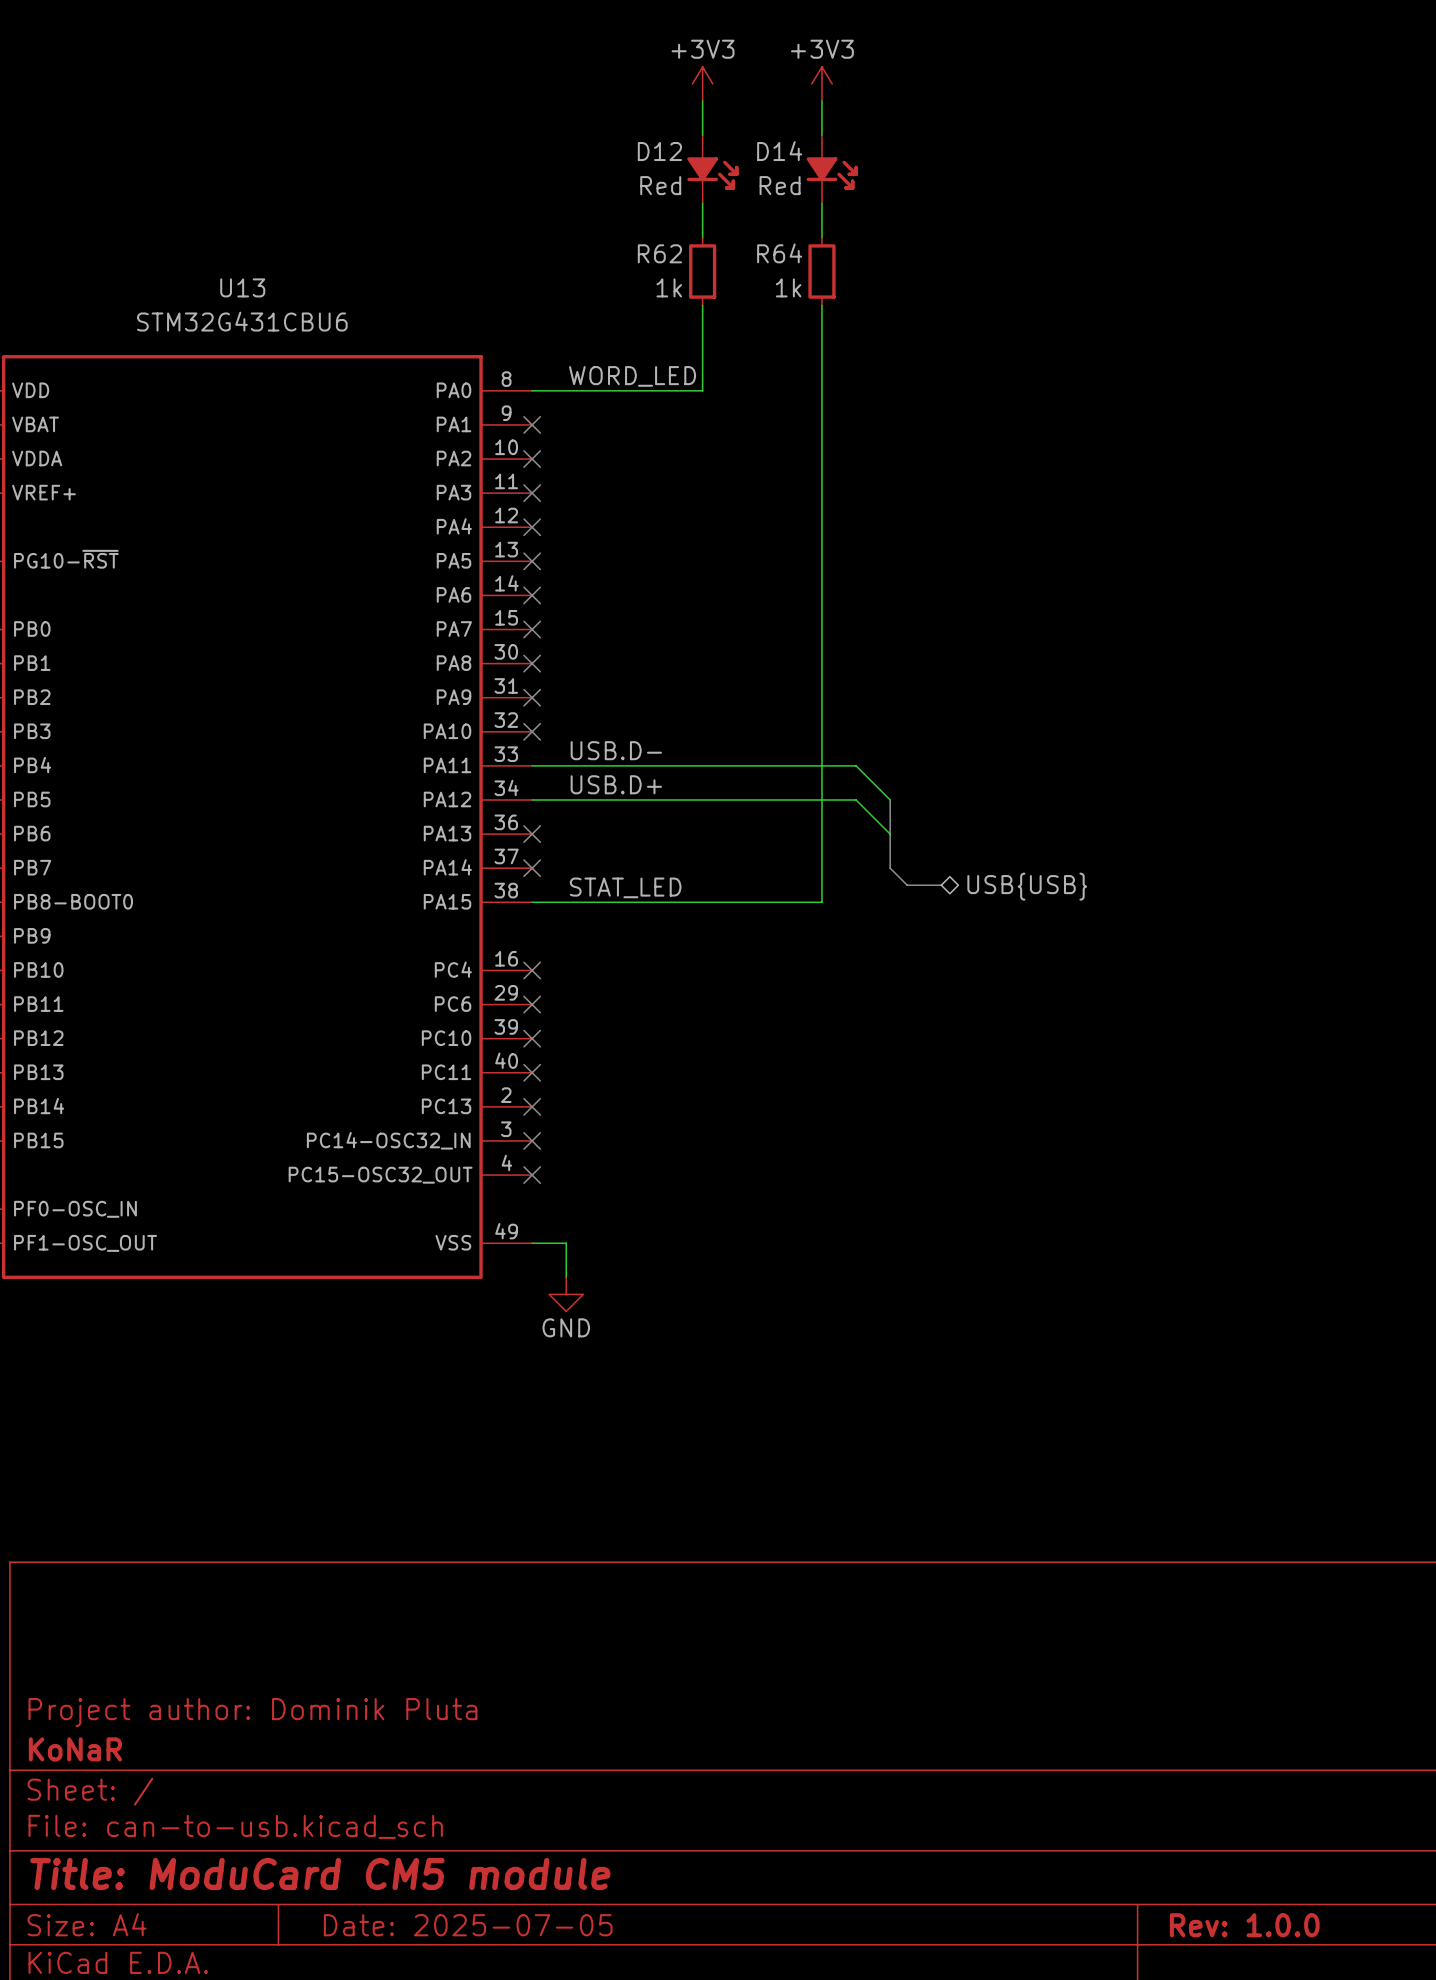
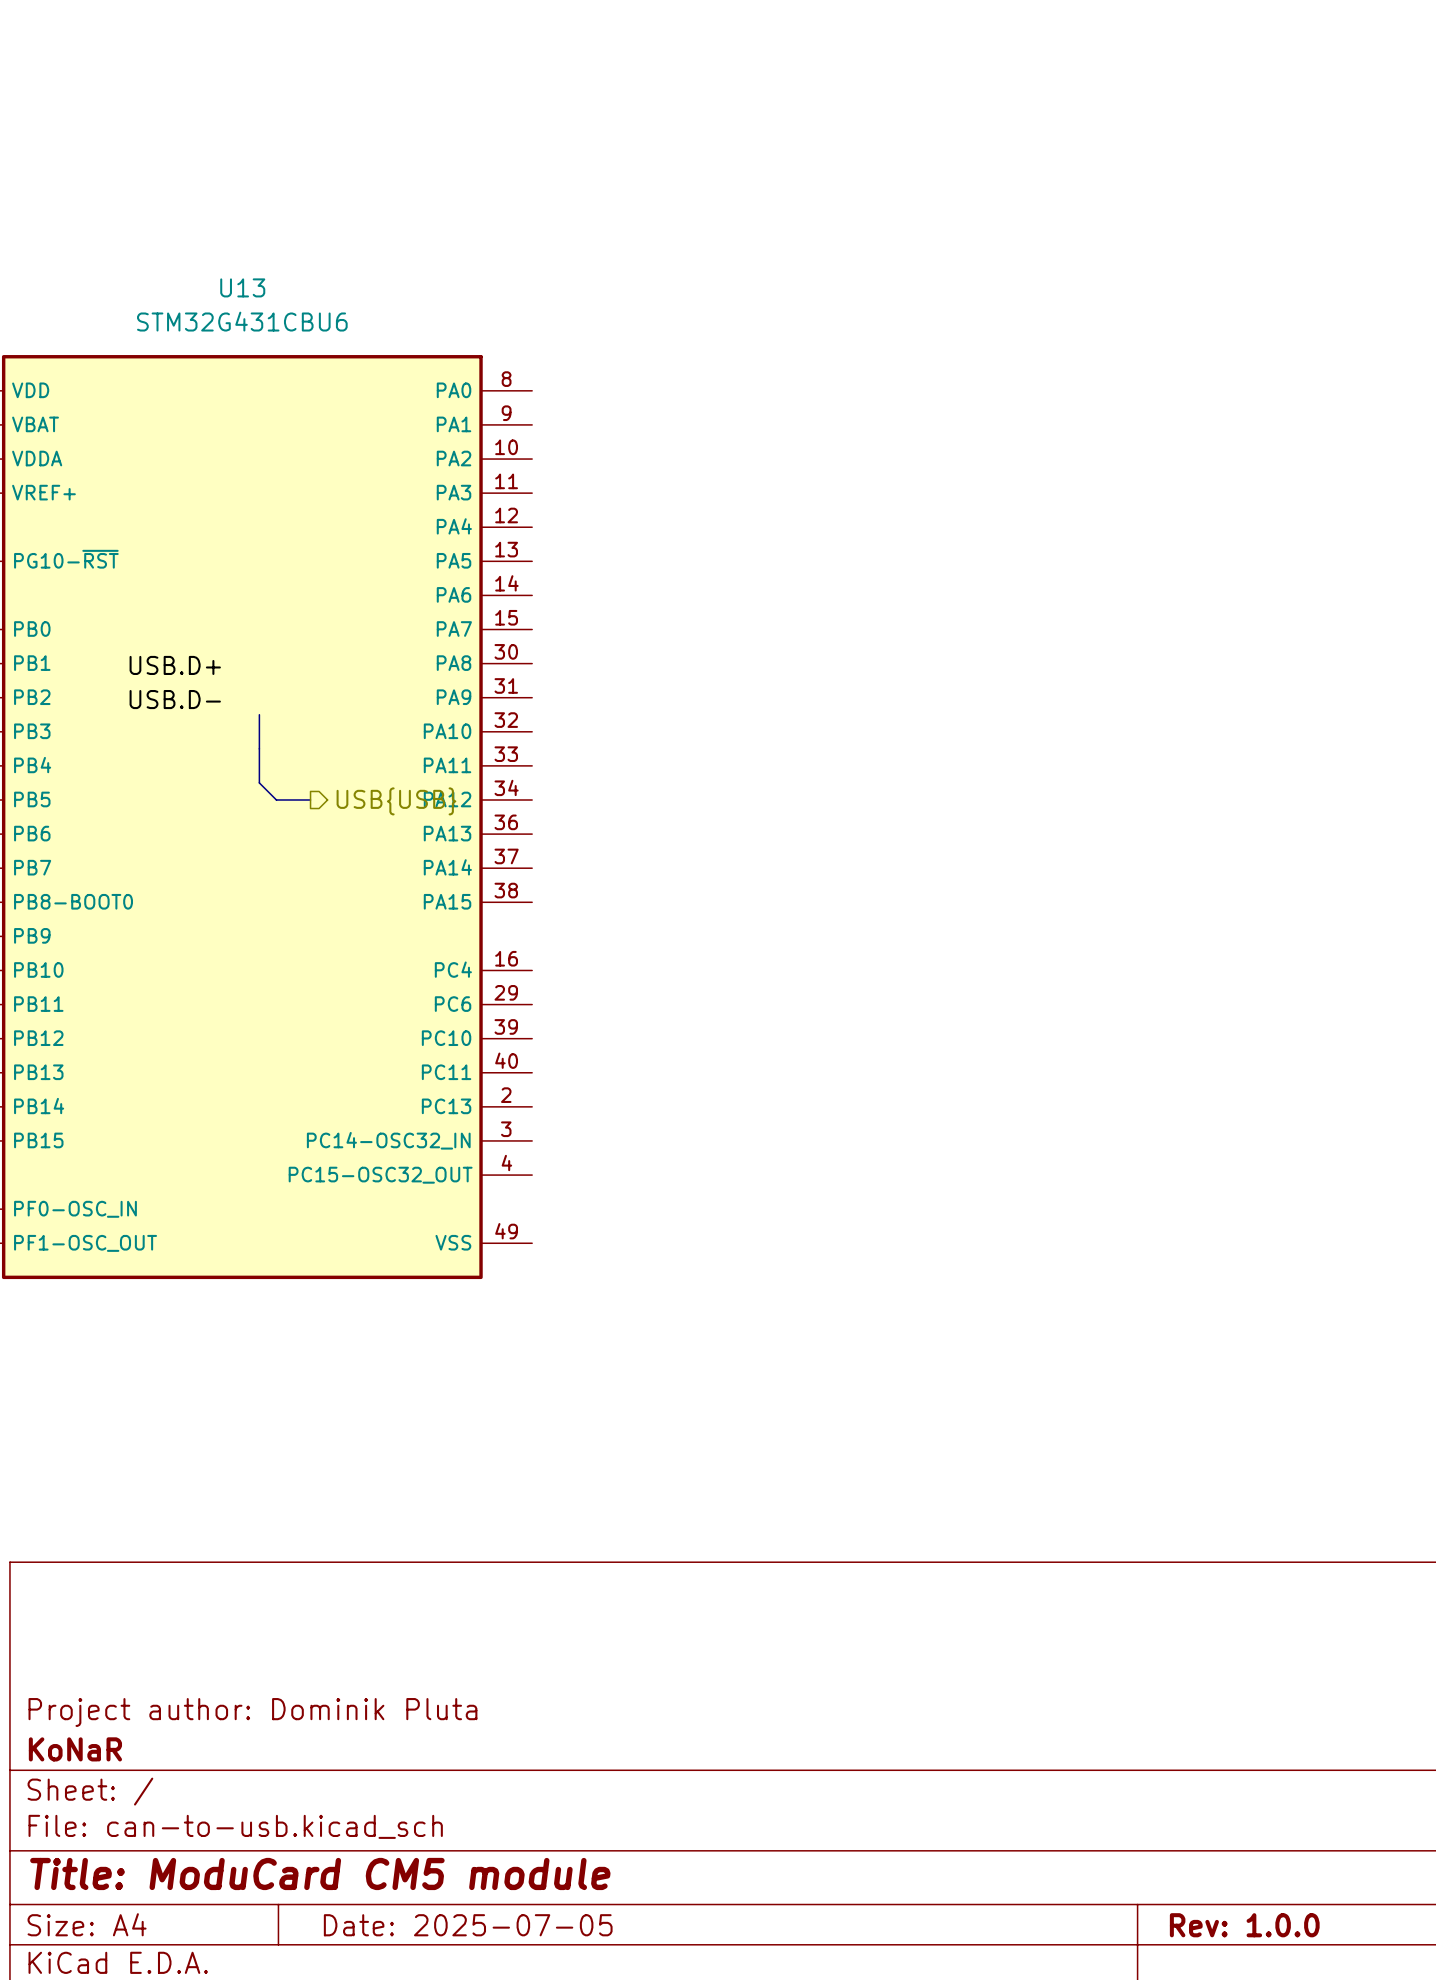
power symbol: +3V3 (702, 83) -> none
power symbol: +3V3 (821, 83) -> none
wire: (702, 101) (702, 135) -> none
wire: (821, 101) (821, 135) -> none
D12: (712, 169) -> none
D14: (832, 169) -> none
wire: (702, 203) (702, 237) -> none
wire: (821, 203) (821, 237) -> none
R62: (702, 271) -> none
R64: (821, 271) -> none
wire: (702, 305) (702, 390) (532, 390) -> none
wire: (821, 305) (821, 902) (532, 902) -> none
label: WORD_LED (632, 376) -> none
no-connect mark: (532, 424) -> none
no-connect mark: (532, 459) -> none
no-connect mark: (532, 493) -> none
no-connect mark: (532, 527) -> none
no-connect mark: (532, 561) -> none
no-connect mark: (532, 595) -> none
no-connect mark: (532, 629) -> none
no-connect mark: (532, 663) -> none
label: none -> USB.D+ (175, 665)
no-connect mark: (532, 697) -> none
label: none -> USB.D- (175, 699)
bus: none -> (259, 714) (259, 782) (276, 799) (310, 799)
no-connect mark: (532, 731) -> none
label: USB.D- (616, 750) -> none
wire: (532, 765) (856, 765) (890, 799) -> none
label: USB.D+ (616, 784) -> none
wire: (532, 799) (856, 799) (890, 834) -> none
bus: (890, 799) (890, 868) (907, 885) (941, 885) -> none
hierarchical label: none -> USB{USB} (396, 801)
no-connect mark: (532, 834) -> none
no-connect mark: (532, 868) -> none
hierarchical label: USB{USB} (1027, 886) -> none
label: STAT_LED (625, 887) -> none
no-connect mark: (532, 970) -> none
no-connect mark: (532, 1004) -> none
no-connect mark: (532, 1038) -> none
no-connect mark: (532, 1072) -> none
no-connect mark: (532, 1106) -> none
no-connect mark: (532, 1140) -> none
no-connect mark: (532, 1175) -> none
wire: (532, 1243) (566, 1243) (566, 1277) -> none
power symbol: GND (566, 1294) -> none

